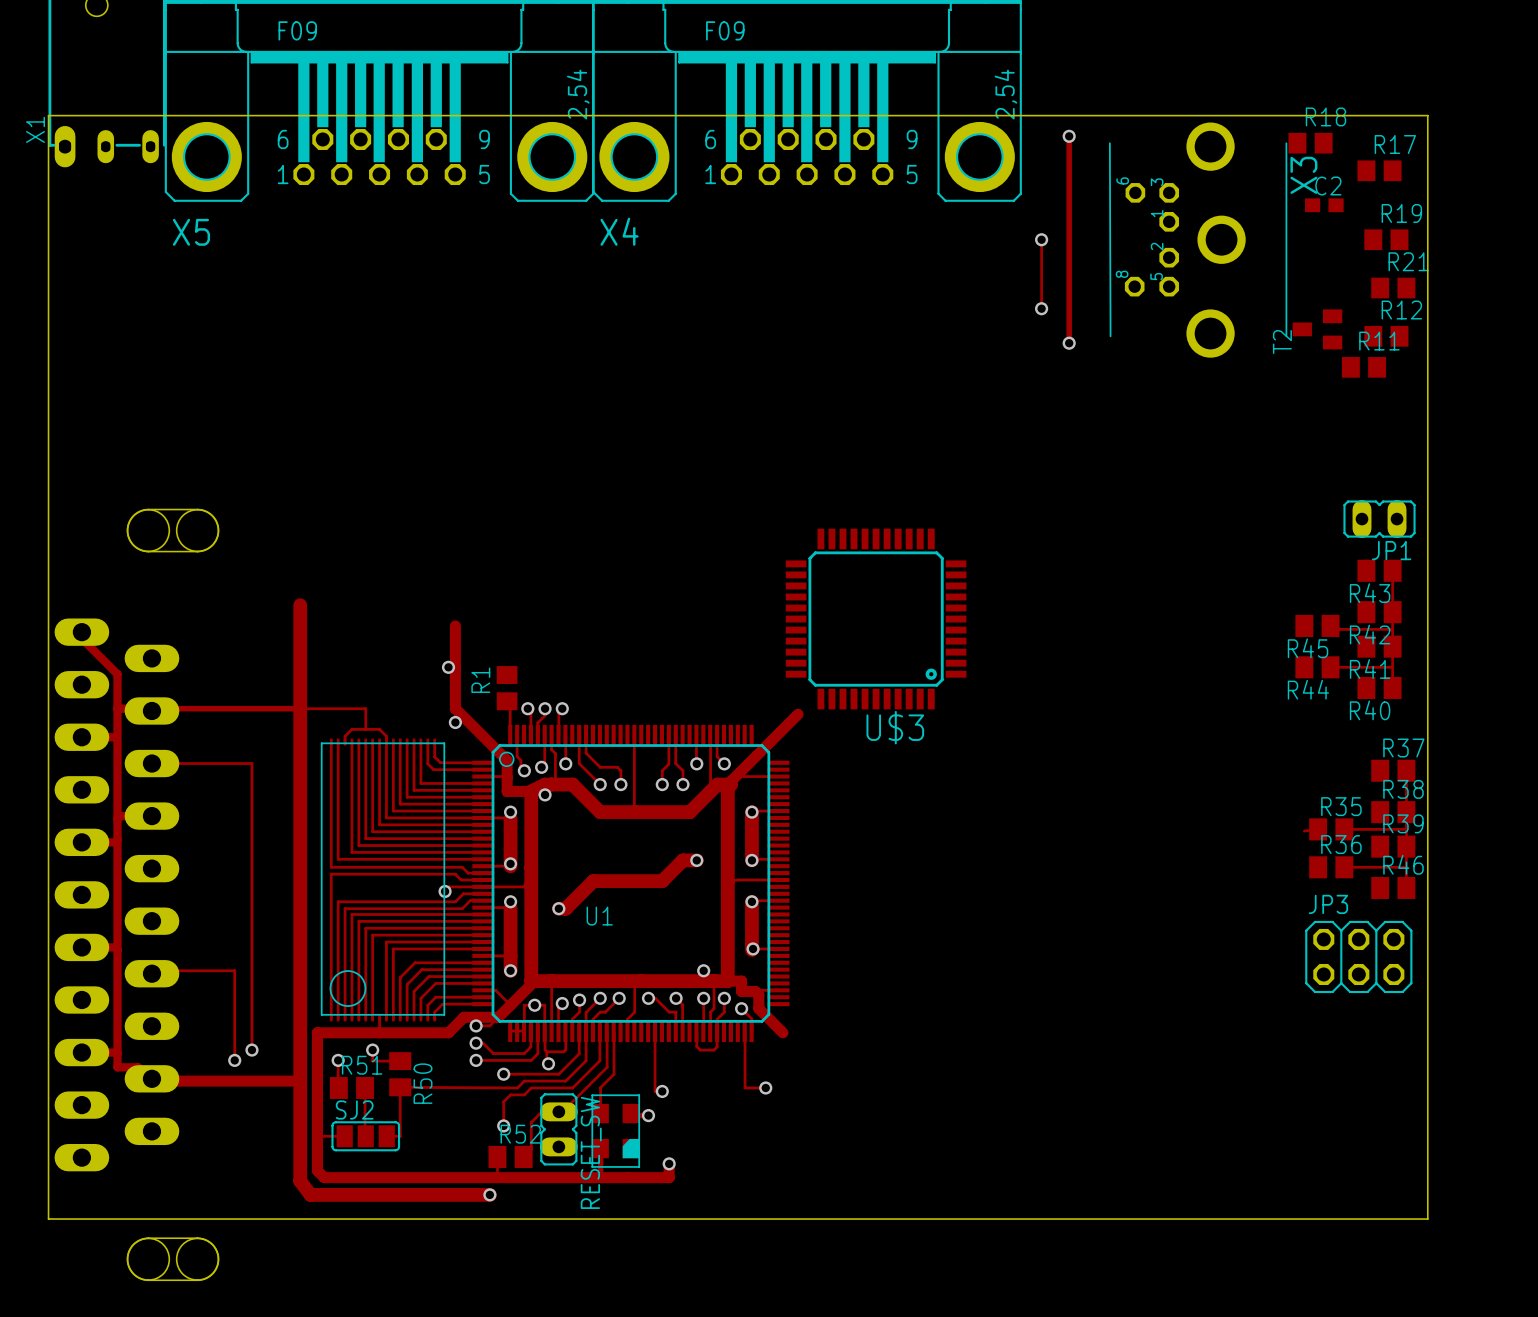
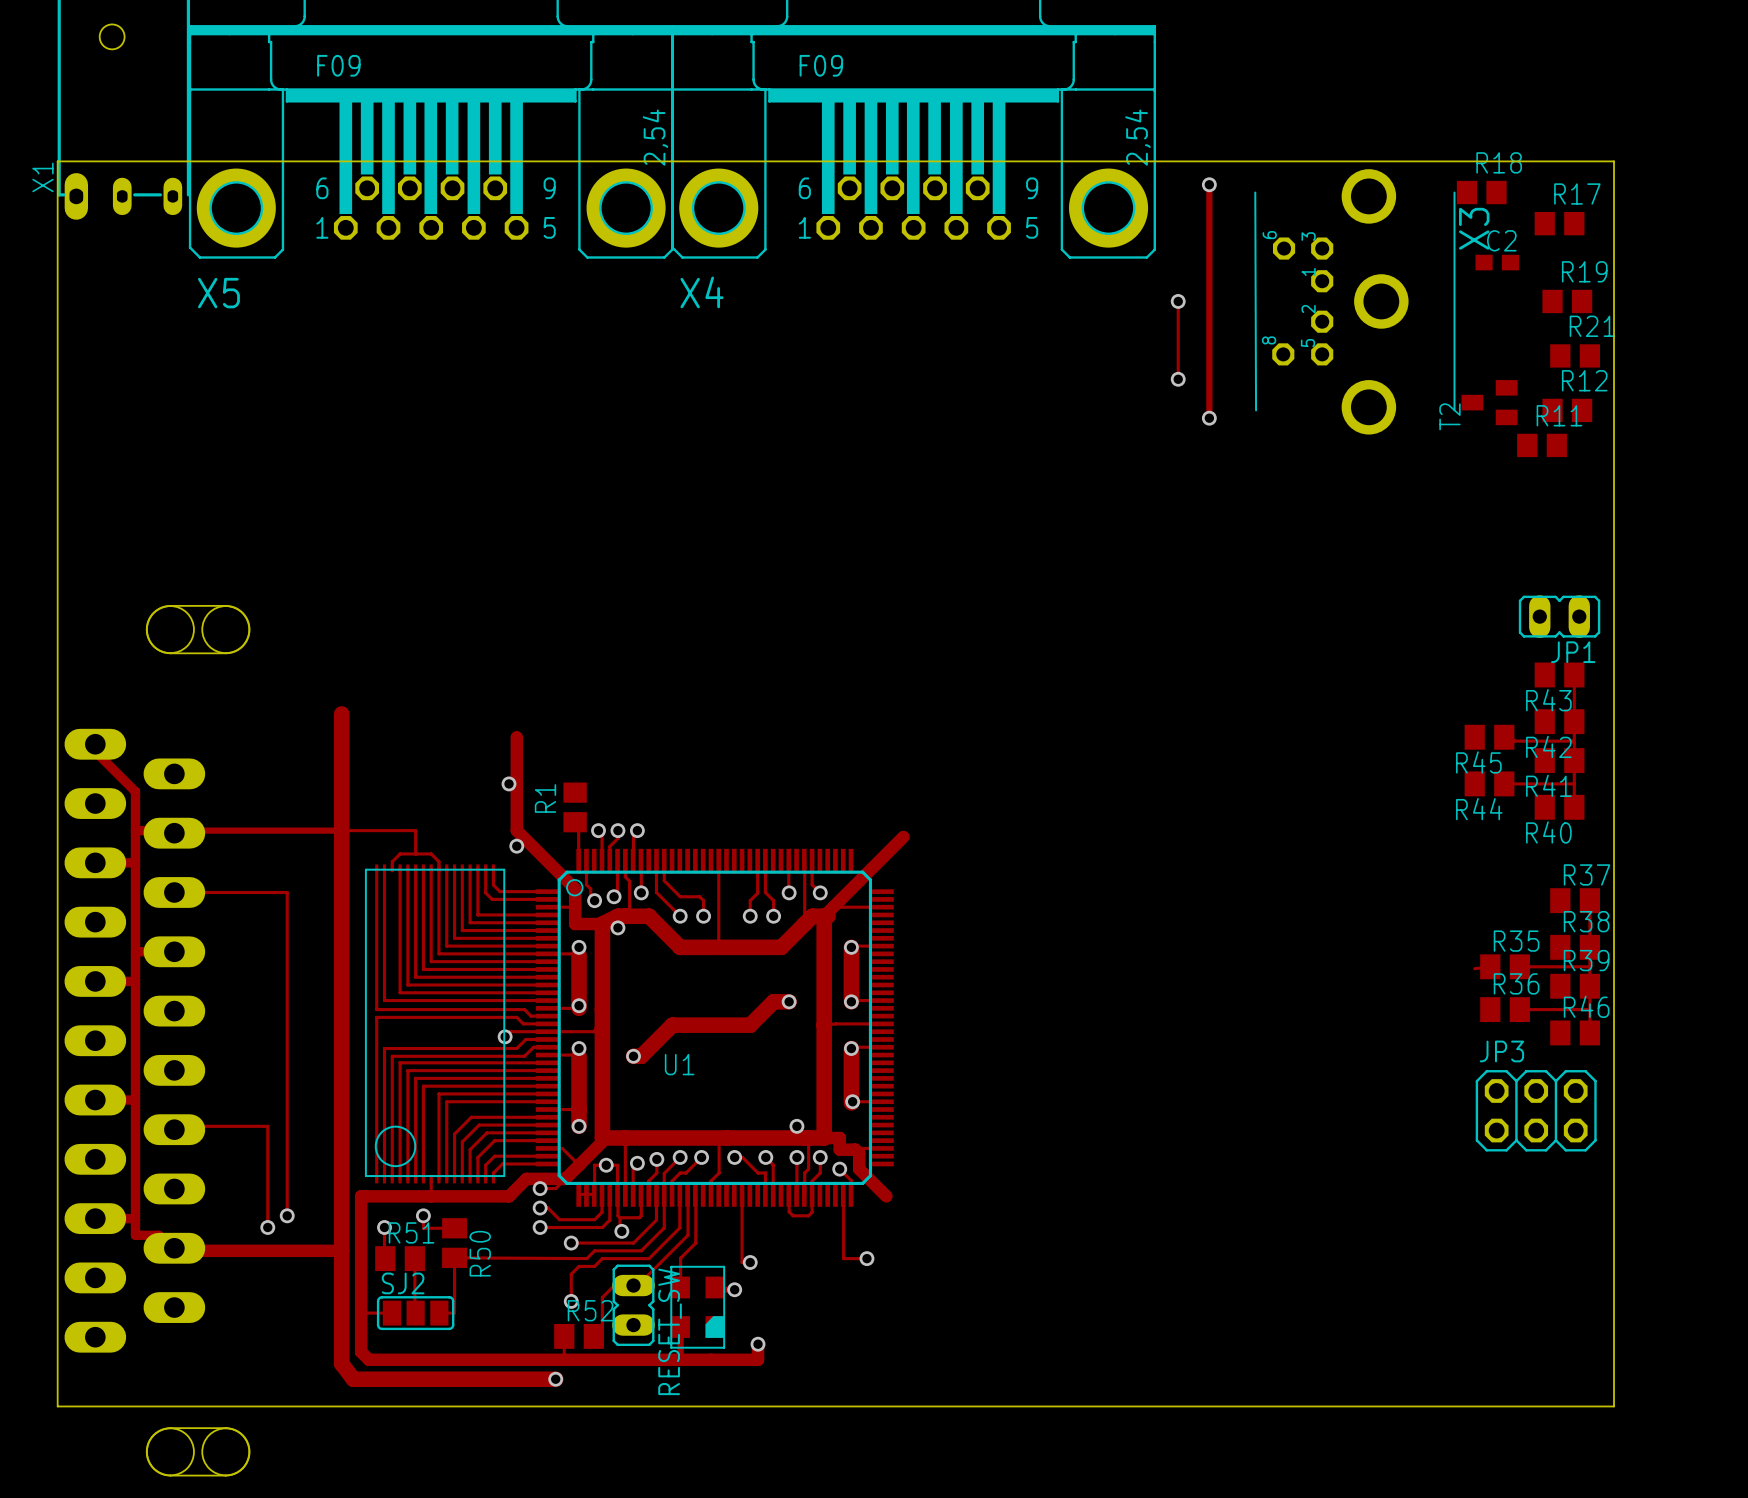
U$3: (876, 619) -> none

